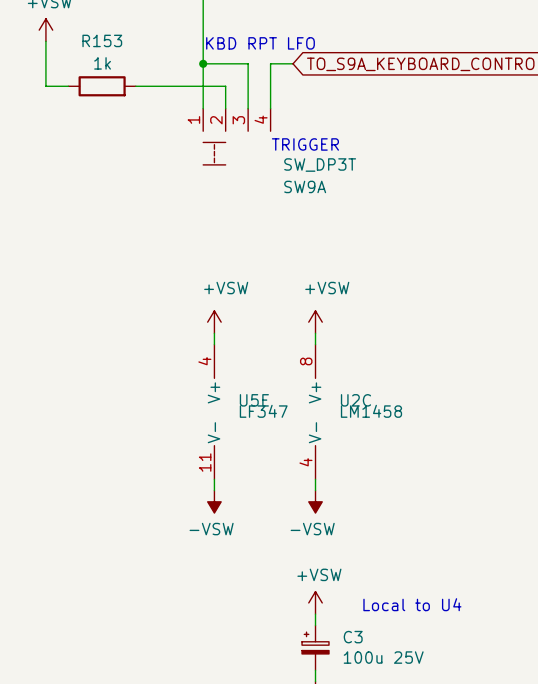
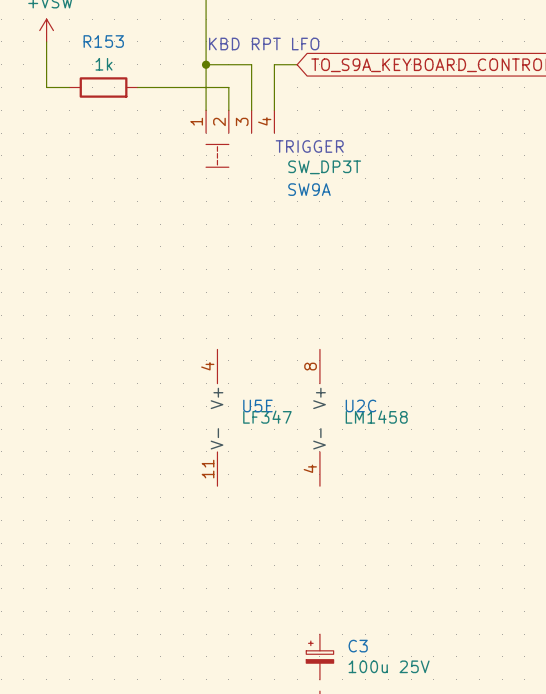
power symbol: +VSW (214, 322) -> none
power symbol: +VSW (315, 322) -> none
wire: (214, 333) (214, 344) -> none
wire: (315, 333) (315, 344) -> none
wire: (214, 479) (214, 490) -> none
wire: (315, 479) (315, 490) -> none
power symbol: -VSW (214, 501) -> none
power symbol: -VSW (315, 501) -> none
power symbol: +VSW (315, 602) -> none
text: Local to U4 (412, 604) -> none
wire: (315, 614) (315, 625) -> none
wire: (315, 670) (315, 681) -> none

